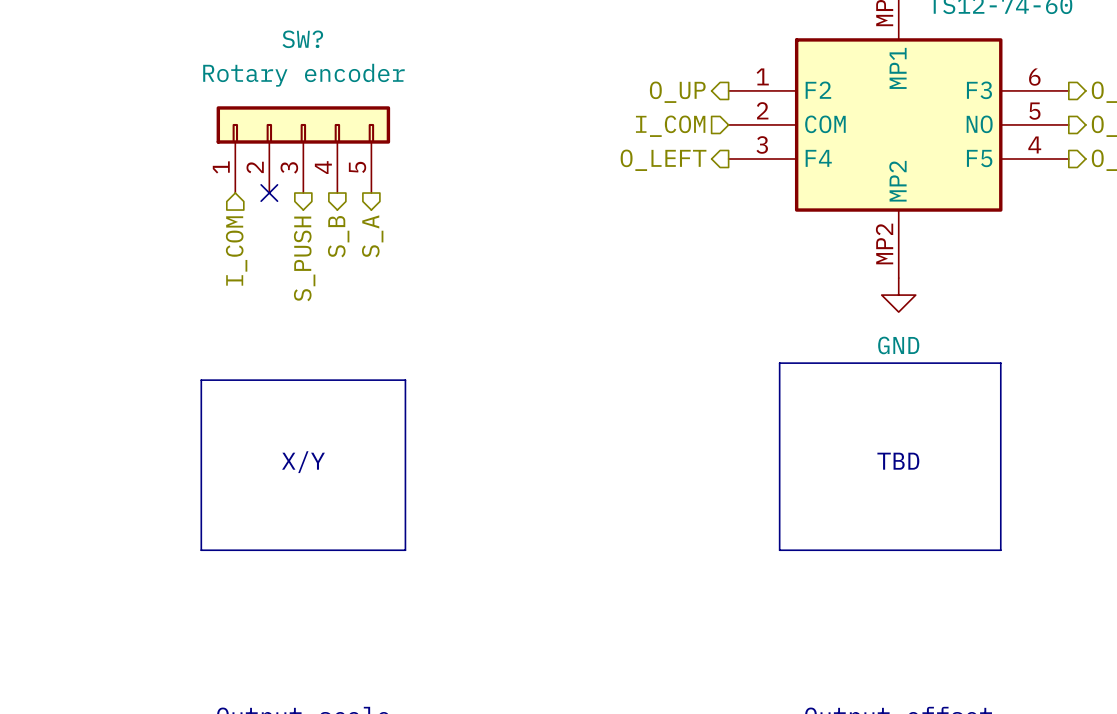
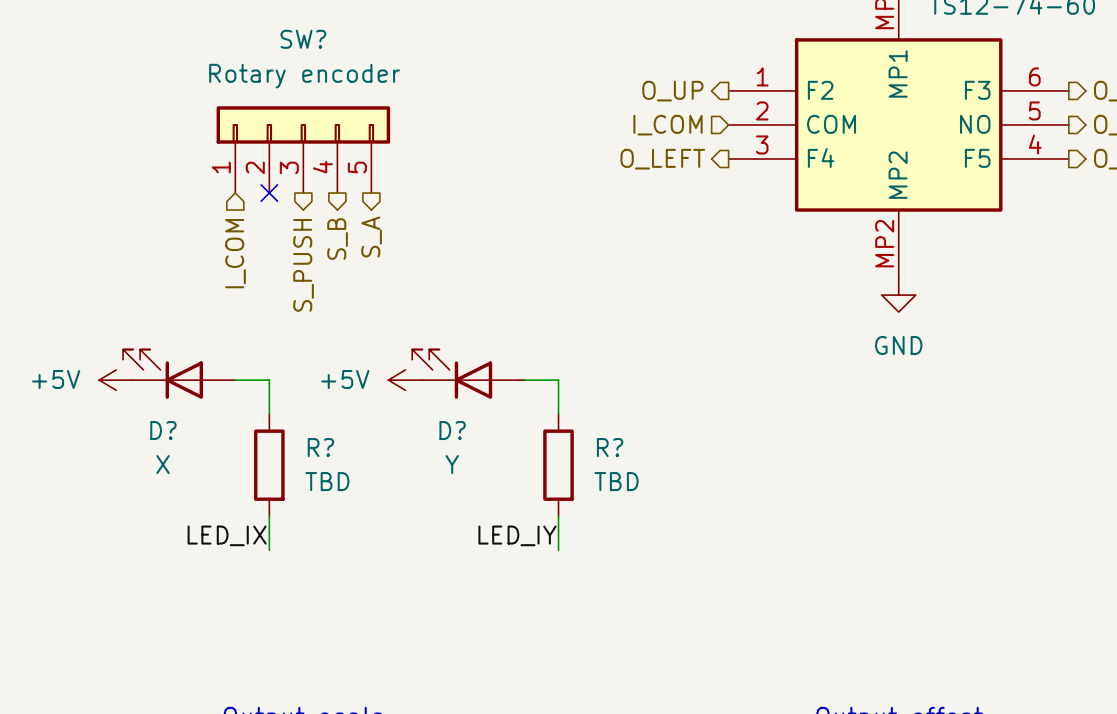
line: (779, 363) (1000, 363) (1000, 550) (779, 550) (779, 363) -> none
D?: none -> X (179, 374)
D?: none -> Y (468, 374)
power symbol: none -> +5V (116, 380)
line: (201, 380) (405, 380) (405, 550) (201, 550) (201, 380) -> none
wire: none -> (235, 380) (269, 380) (269, 414)
power symbol: none -> +5V (405, 380)
wire: none -> (524, 380) (558, 380) (558, 414)
text: TBD (898, 461) -> none
text: X/Y (303, 462) -> none
R?: none -> TBD (269, 465)
R?: none -> TBD (558, 465)
wire: none -> (269, 516) (269, 550)
wire: none -> (558, 516) (558, 550)
label: none -> LED_IX (227, 535)
label: none -> LED_IY (517, 535)

